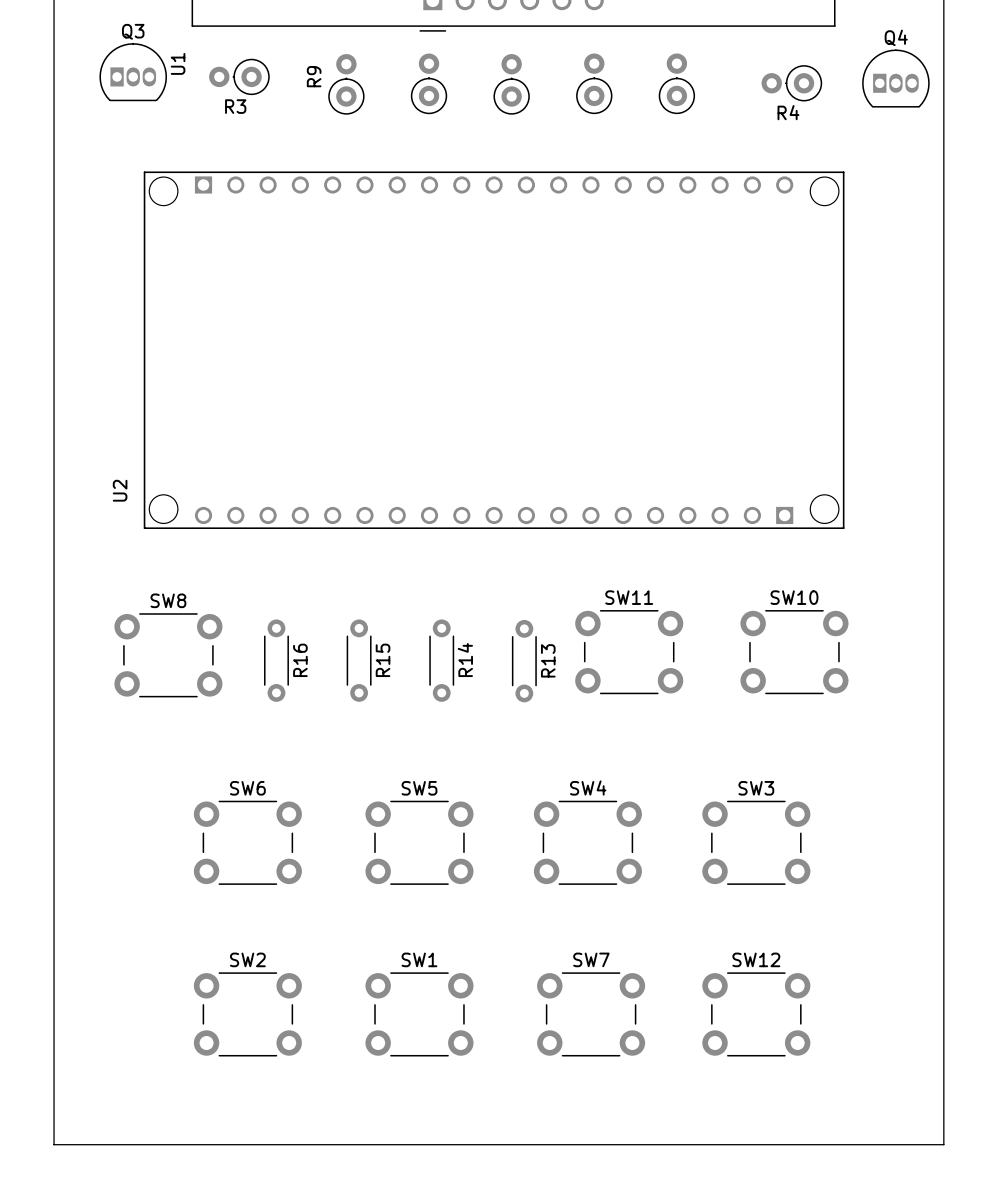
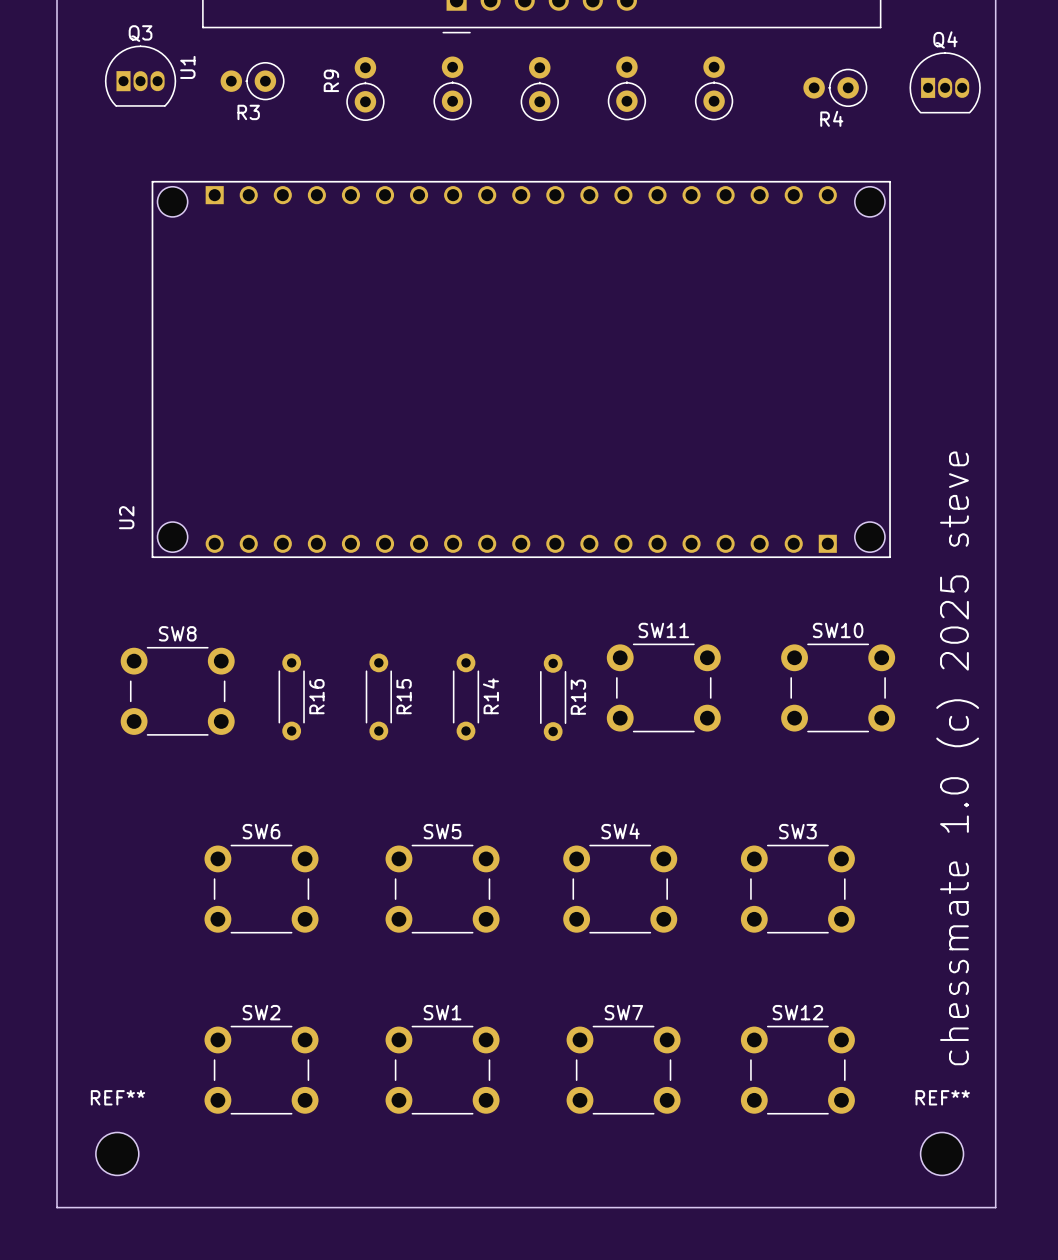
text: none -> chessmate 1.0 (c) 2025 steve (957, 758)
REF**: none -> (117, 1153)
REF**: none -> (942, 1153)

